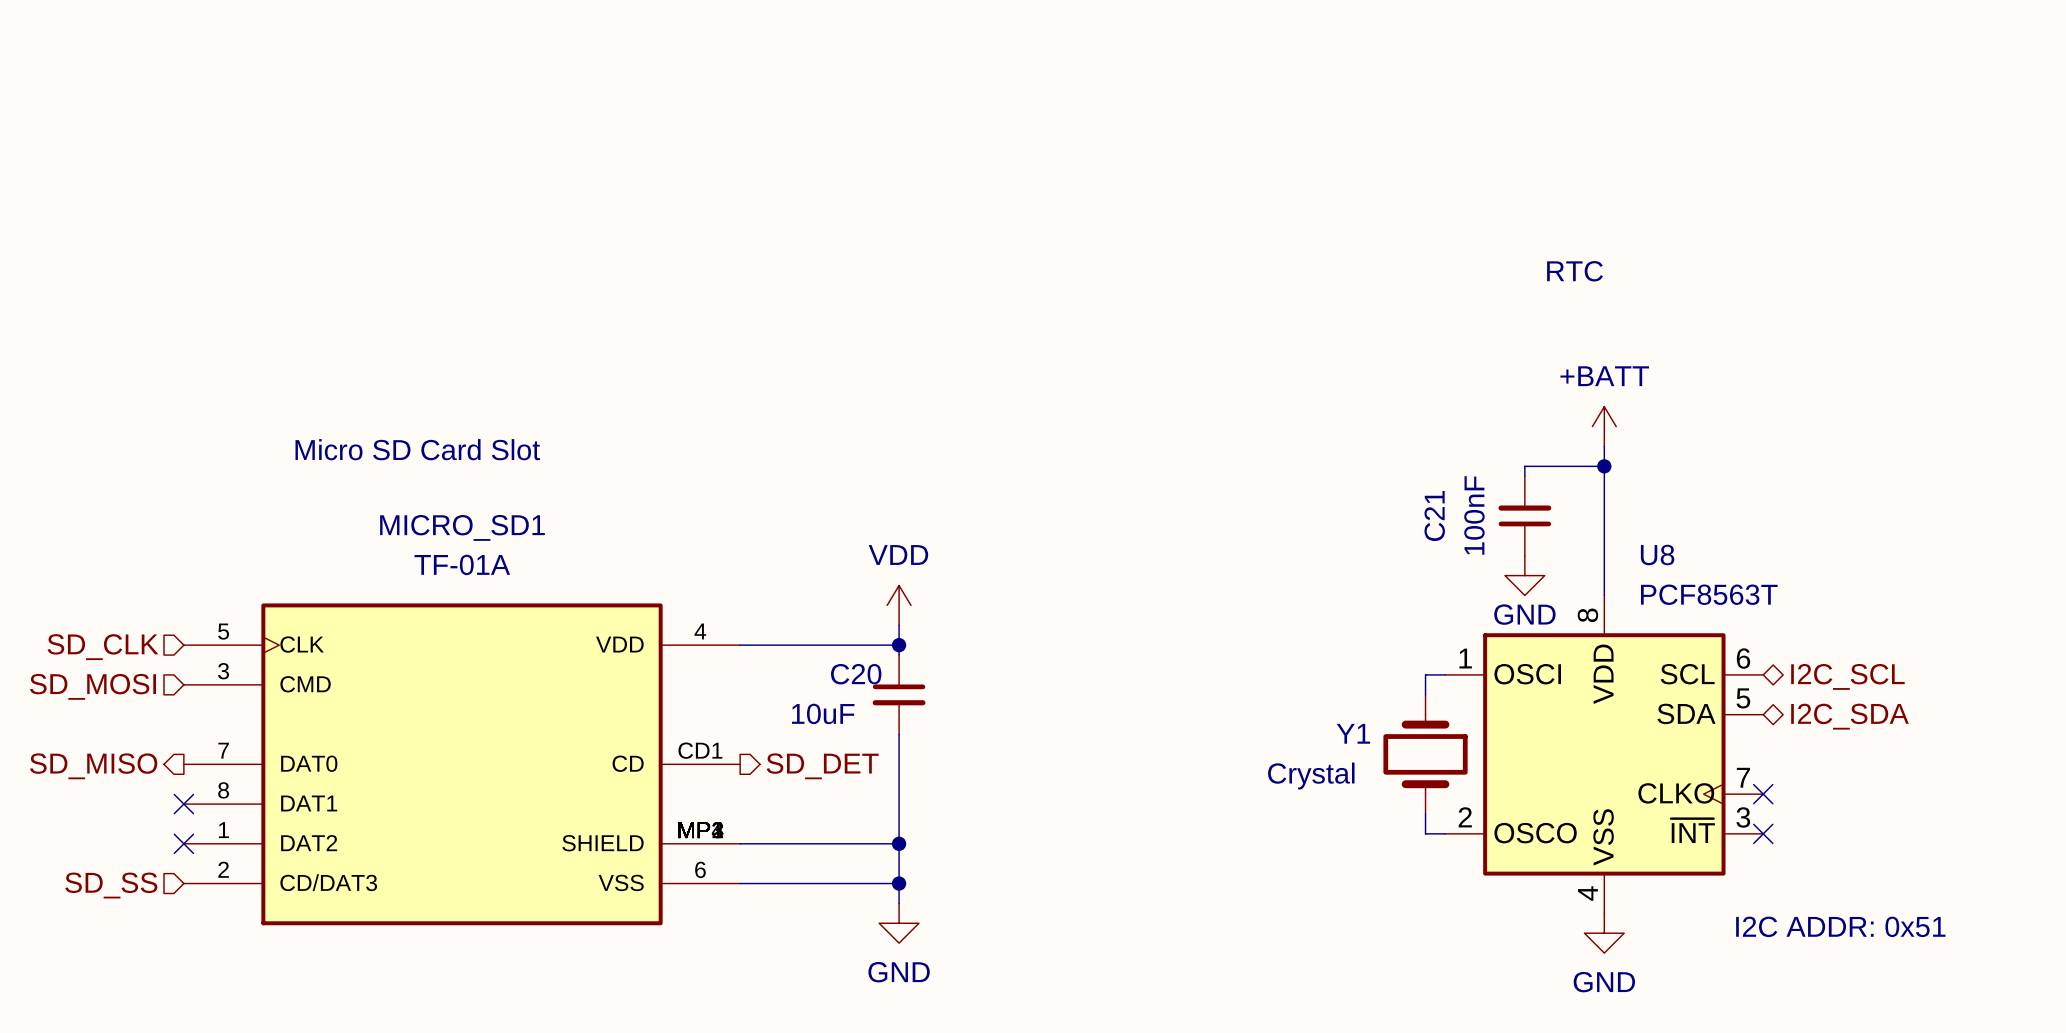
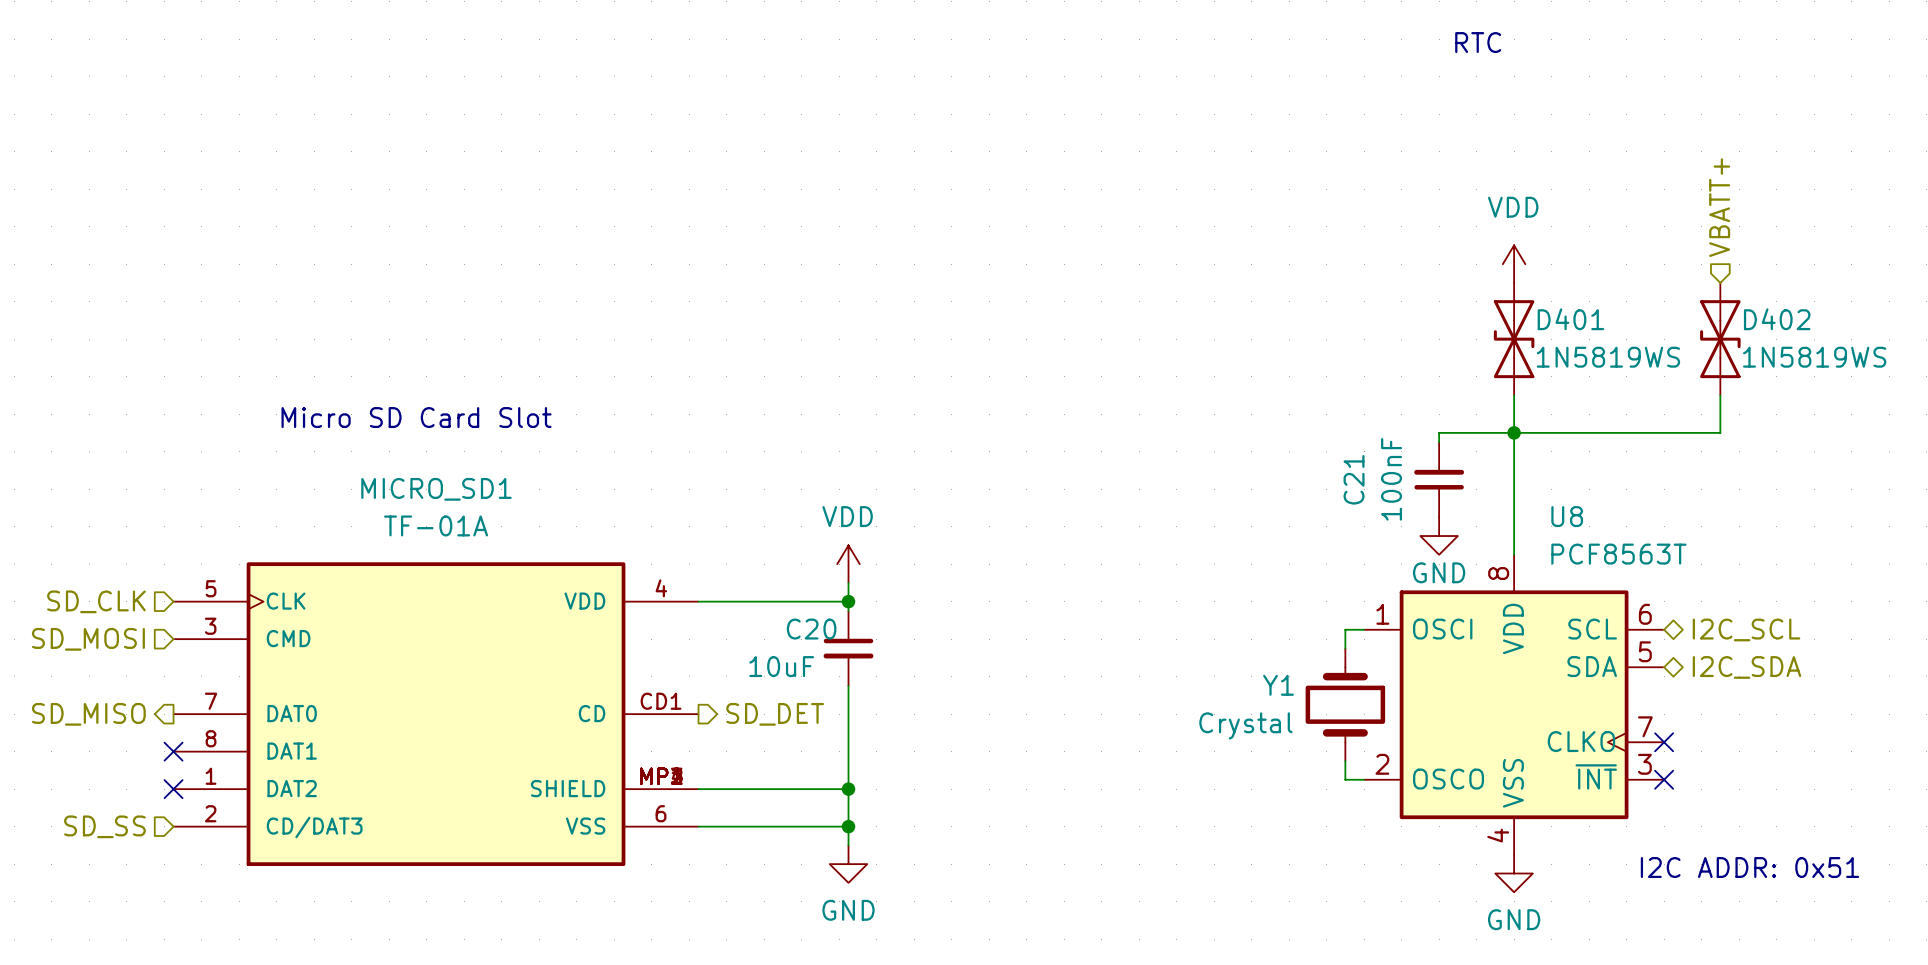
hierarchical label: none -> VBATT+ (1719, 207)
text position: RTC (1575, 271) -> RTC (1478, 42)
power symbol: none -> VDD (1514, 264)
D401: none -> 1N5819WS (1514, 339)
D402: none -> 1N5819WS (1720, 339)
power symbol: +BATT (1604, 426) -> none
wire: none -> (1720, 395) (1720, 432) (1514, 432)

